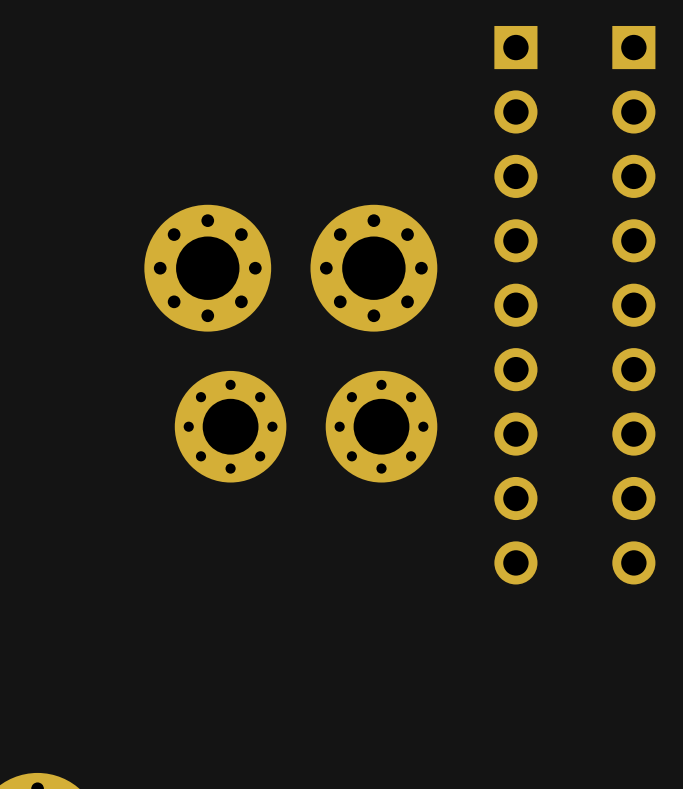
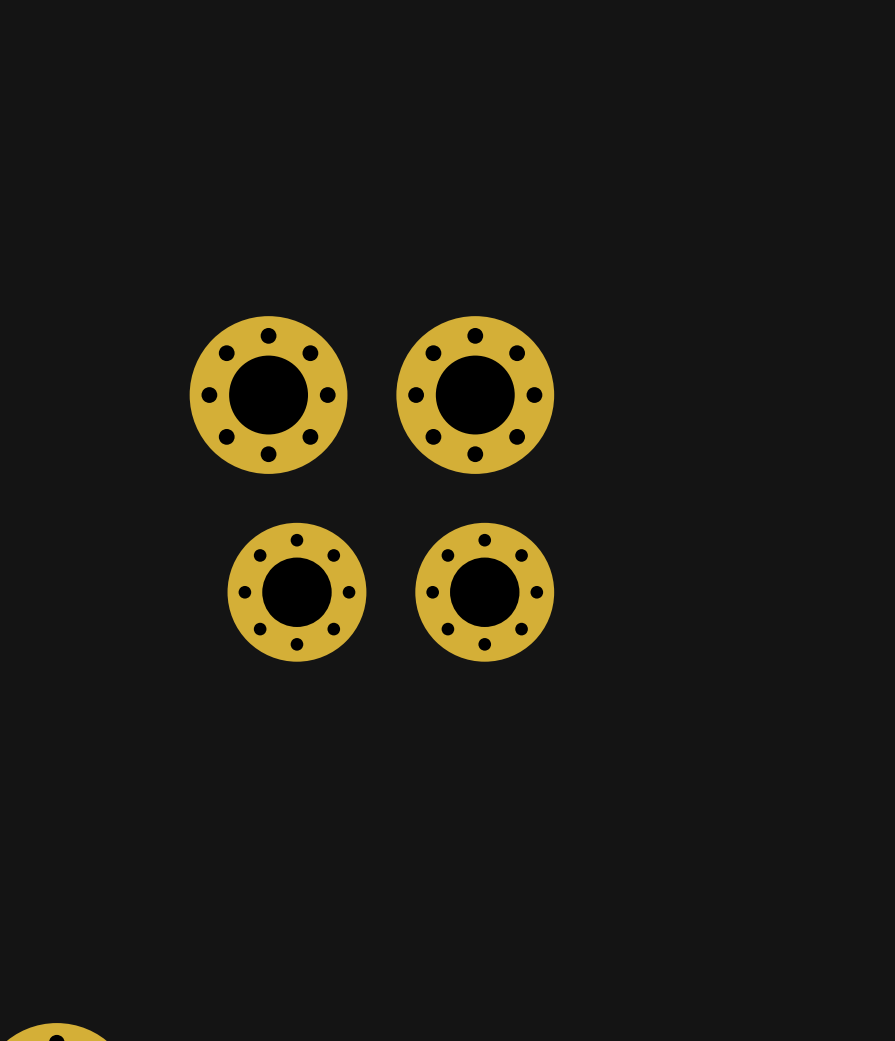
part: (515, 305) -> none
part: (633, 305) -> none

